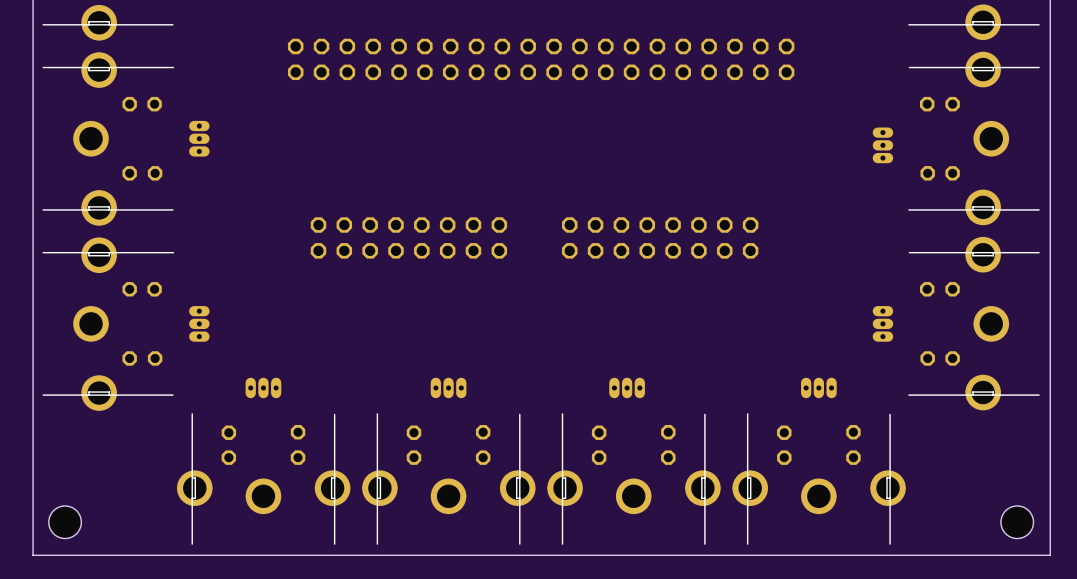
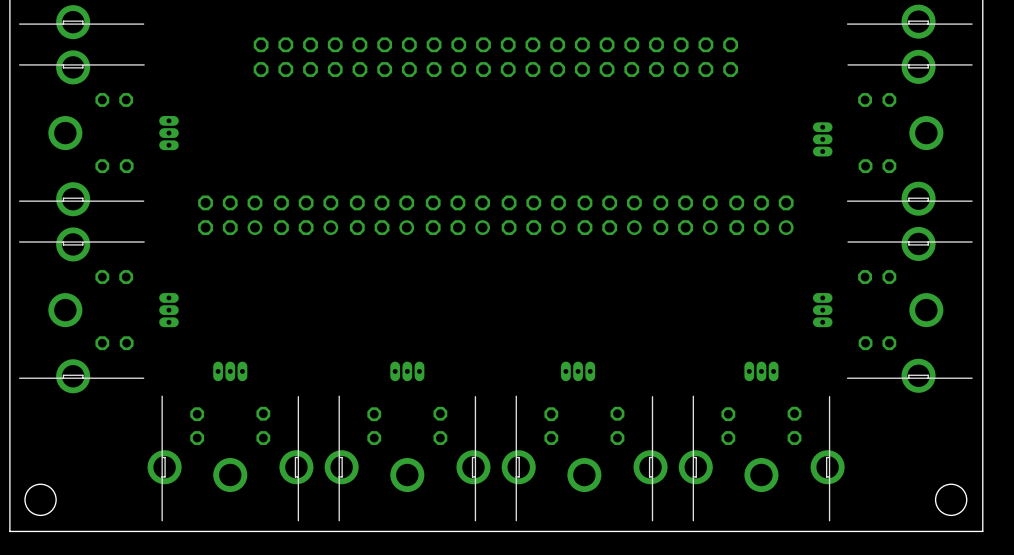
part: none -> (230, 215)
part: none -> (306, 215)
part: none -> (382, 215)
part: none -> (457, 215)
part: none -> (533, 215)
part: none -> (609, 215)
part: none -> (685, 215)
part: none -> (761, 215)
part: (408, 237) -> none
part: (660, 237) -> none

